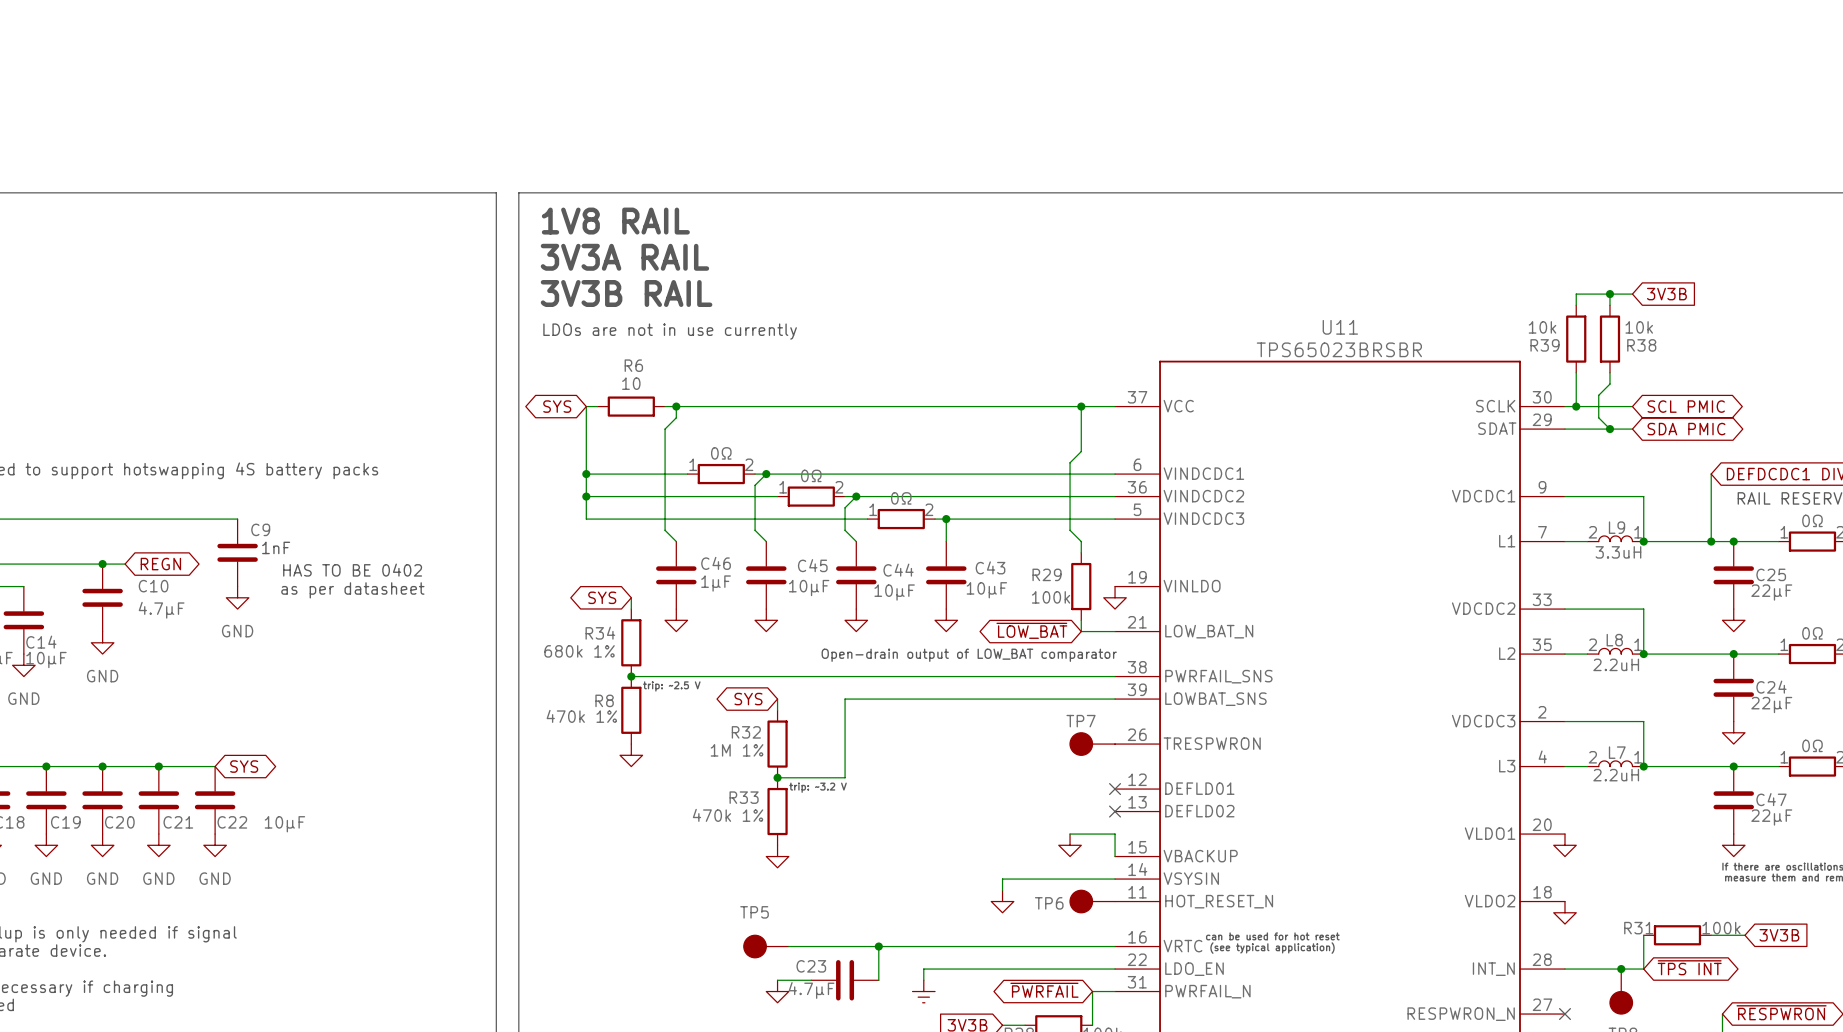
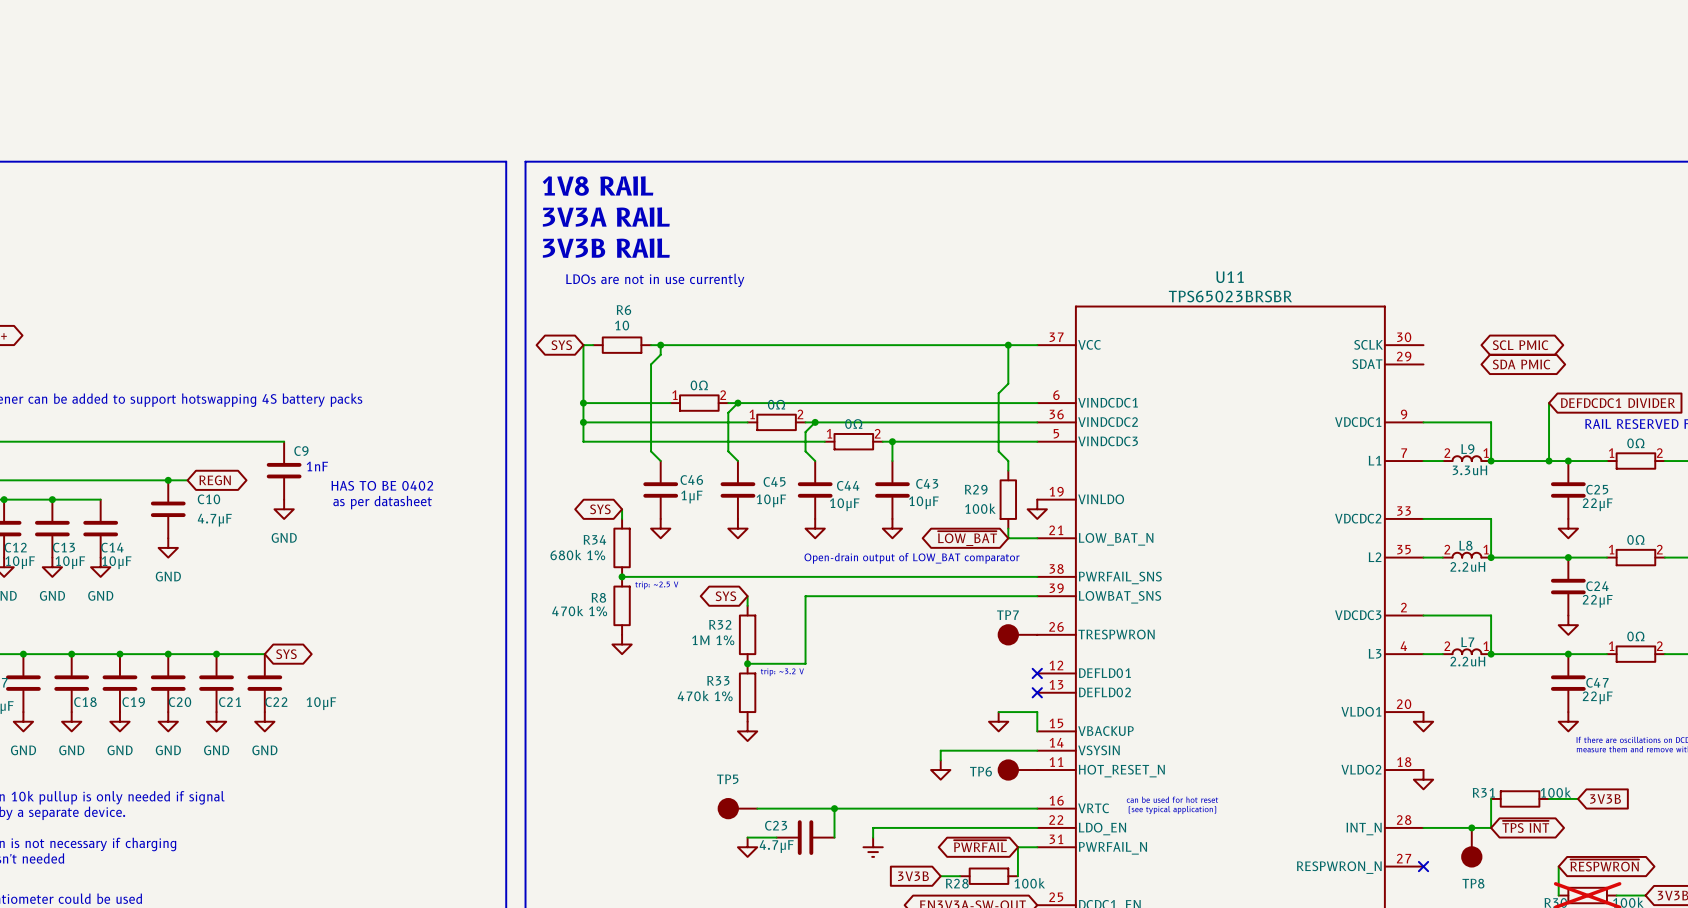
wire: (1609, 294) (1609, 305) -> none
junction: (1609, 294) -> none
wire: (1632, 294) (1576, 294) (1576, 305) -> none
global label: 3V3B (1666, 294) -> none
R39: 10k (1576, 339) -> none
R38: 10k (1609, 339) -> none
wire: (1576, 372) (1576, 406) -> none
wire: (1609, 372) (1609, 384) (1598, 395) (1598, 417) (1609, 429) -> none
wire: (1564, 406) (1632, 406) -> none
junction: (1576, 406) -> none
wire: (1564, 429) (1632, 429) -> none
junction: (1609, 429) -> none

